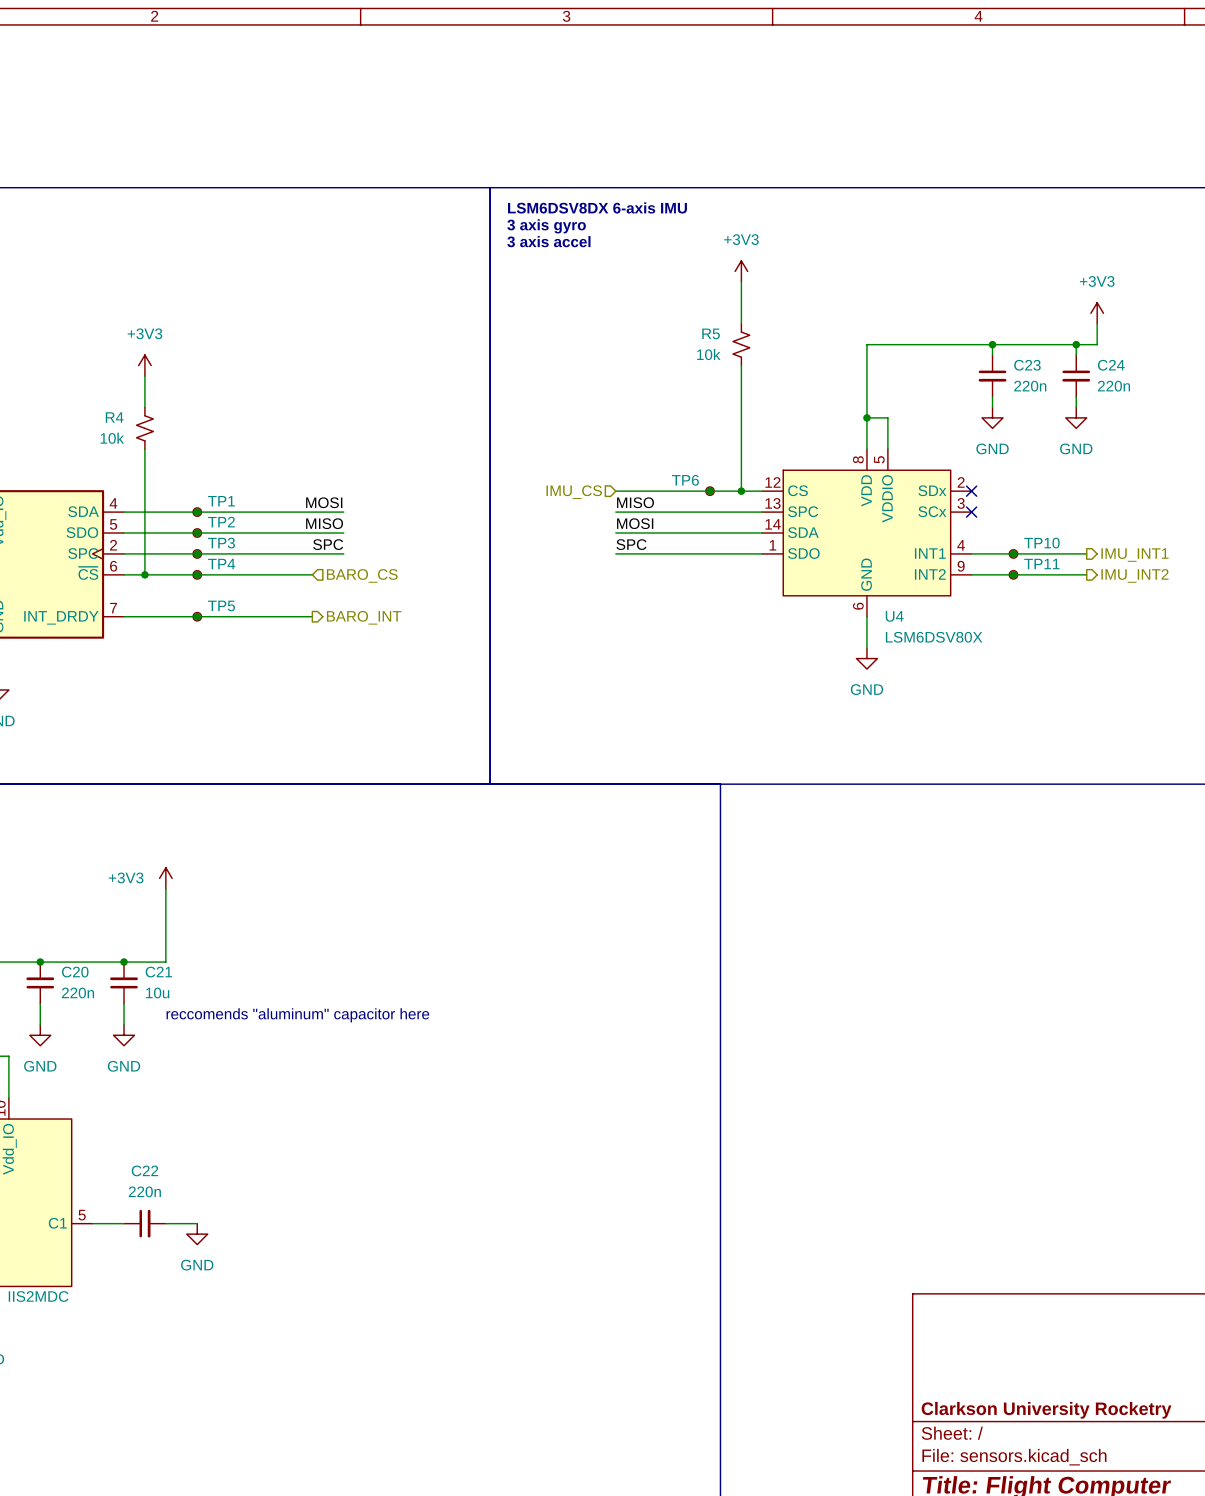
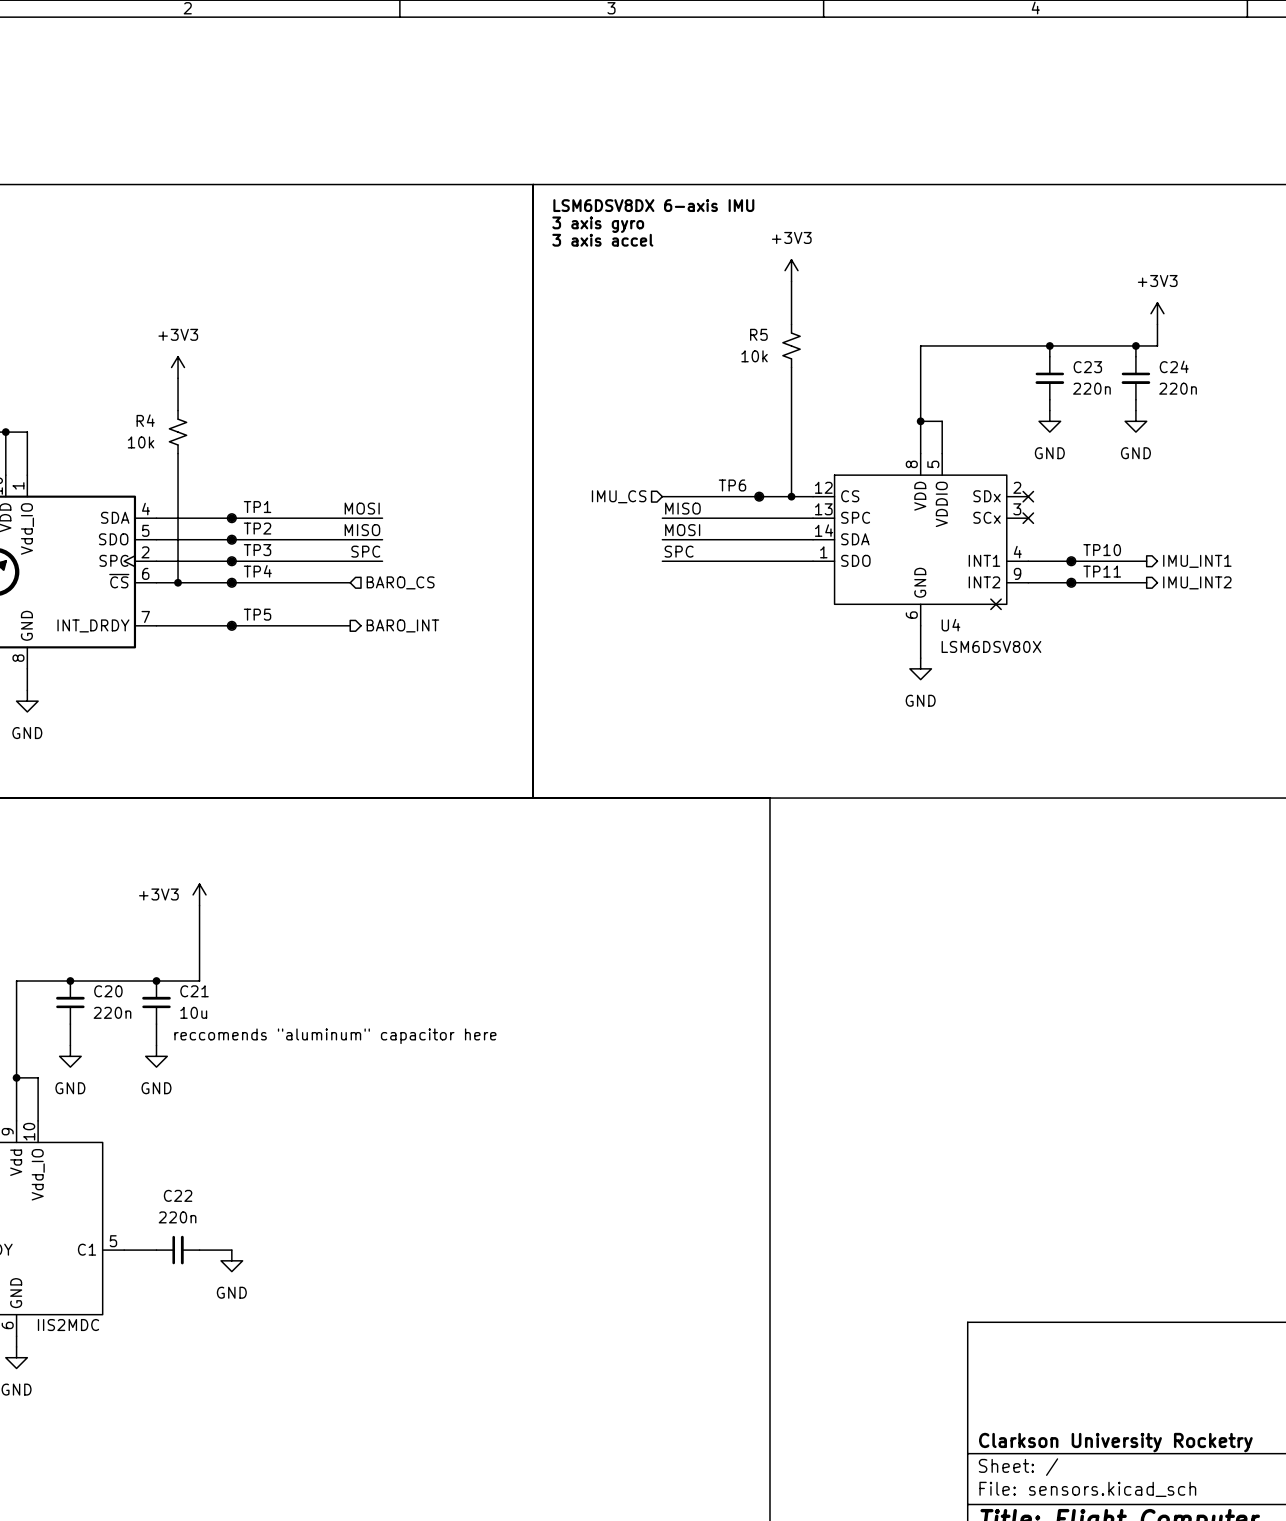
no-connect mark: none -> (996, 604)

